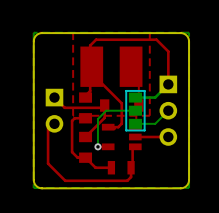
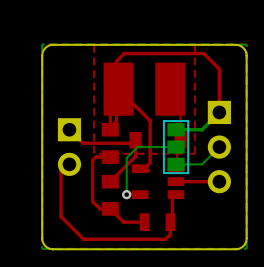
top track: (91, 73) (121, 103) (121, 123) (118, 127) (110, 127) -> none
top track: none -> (110, 129) (110, 97) (118, 89) (150, 120) (150, 162) (146, 166)

